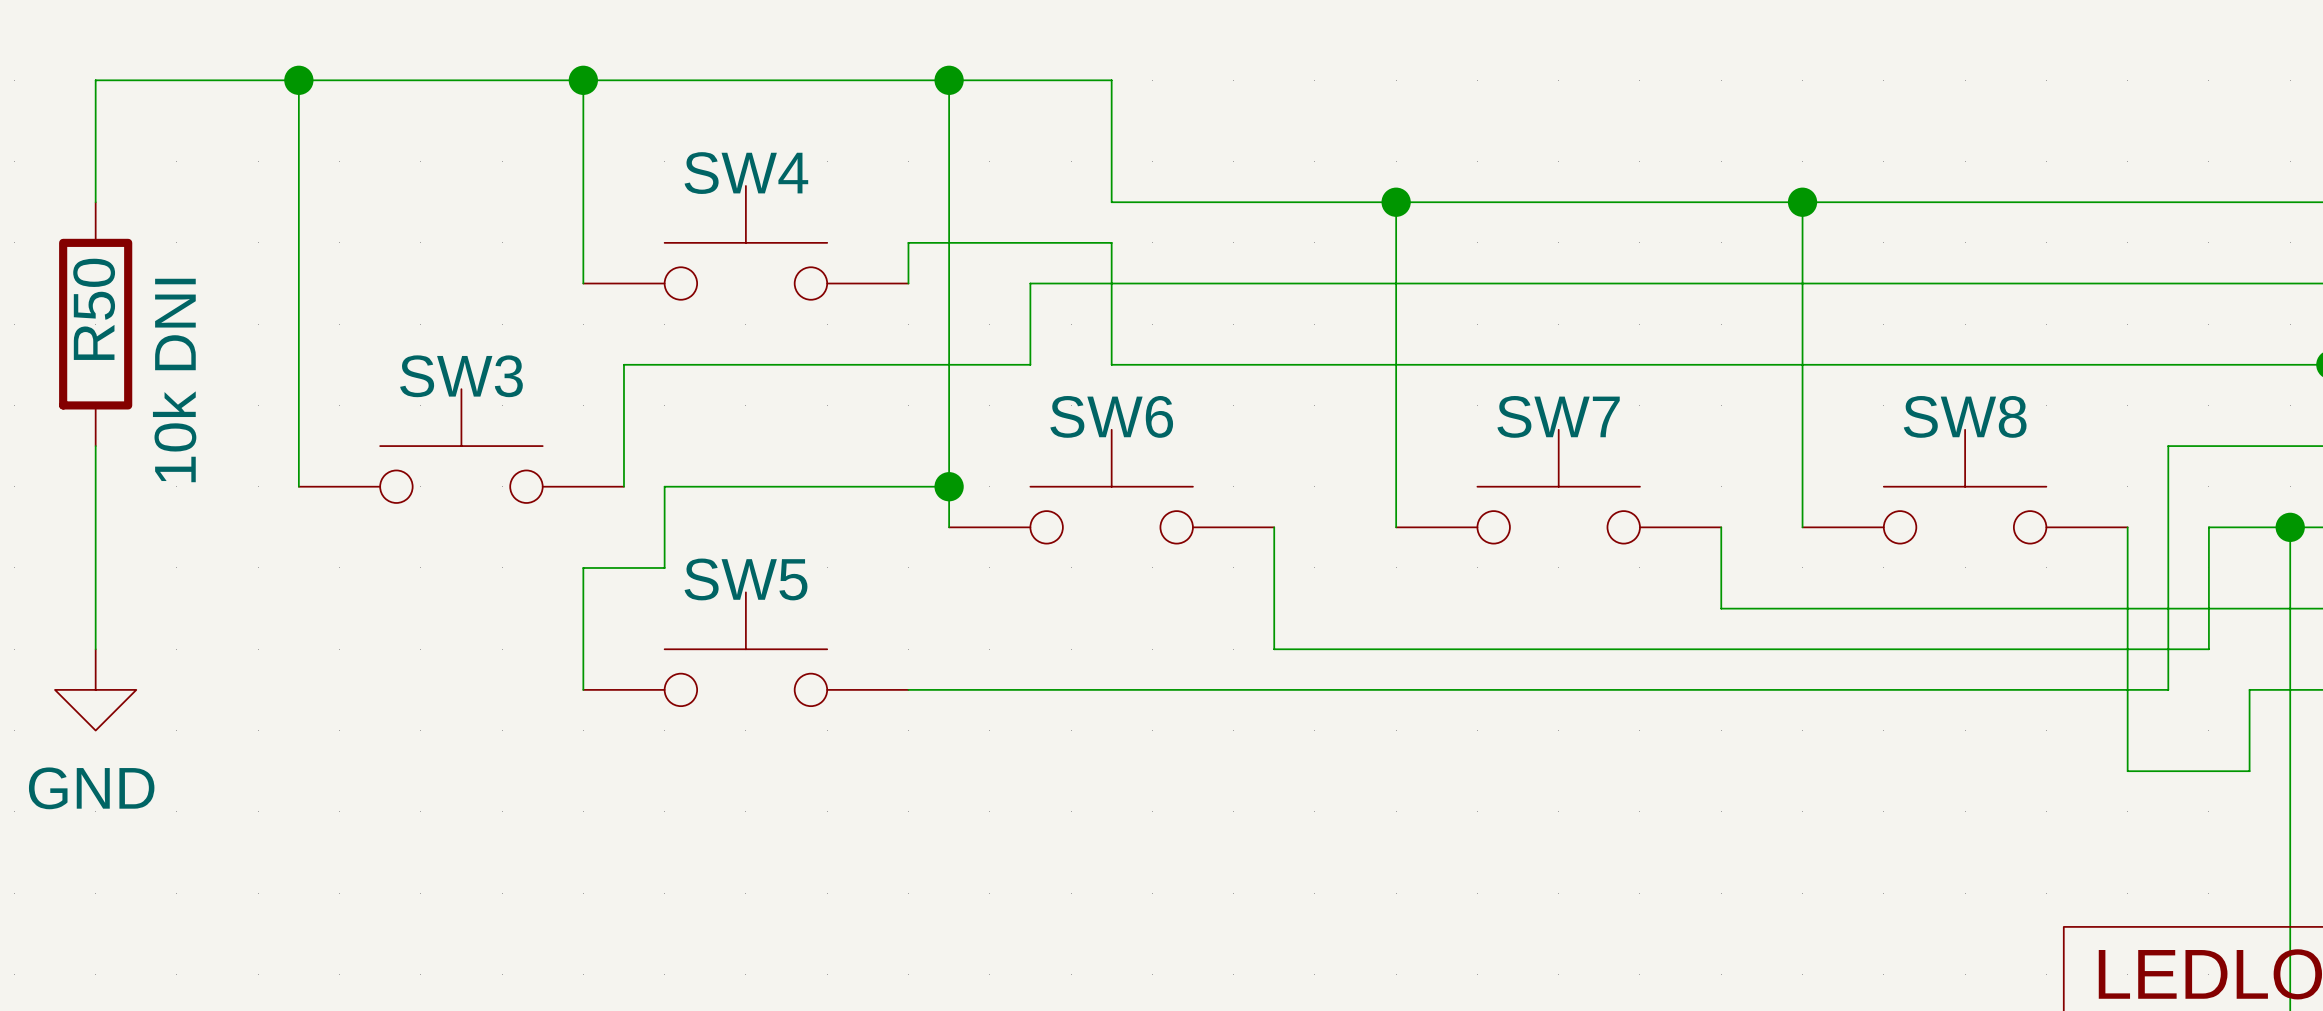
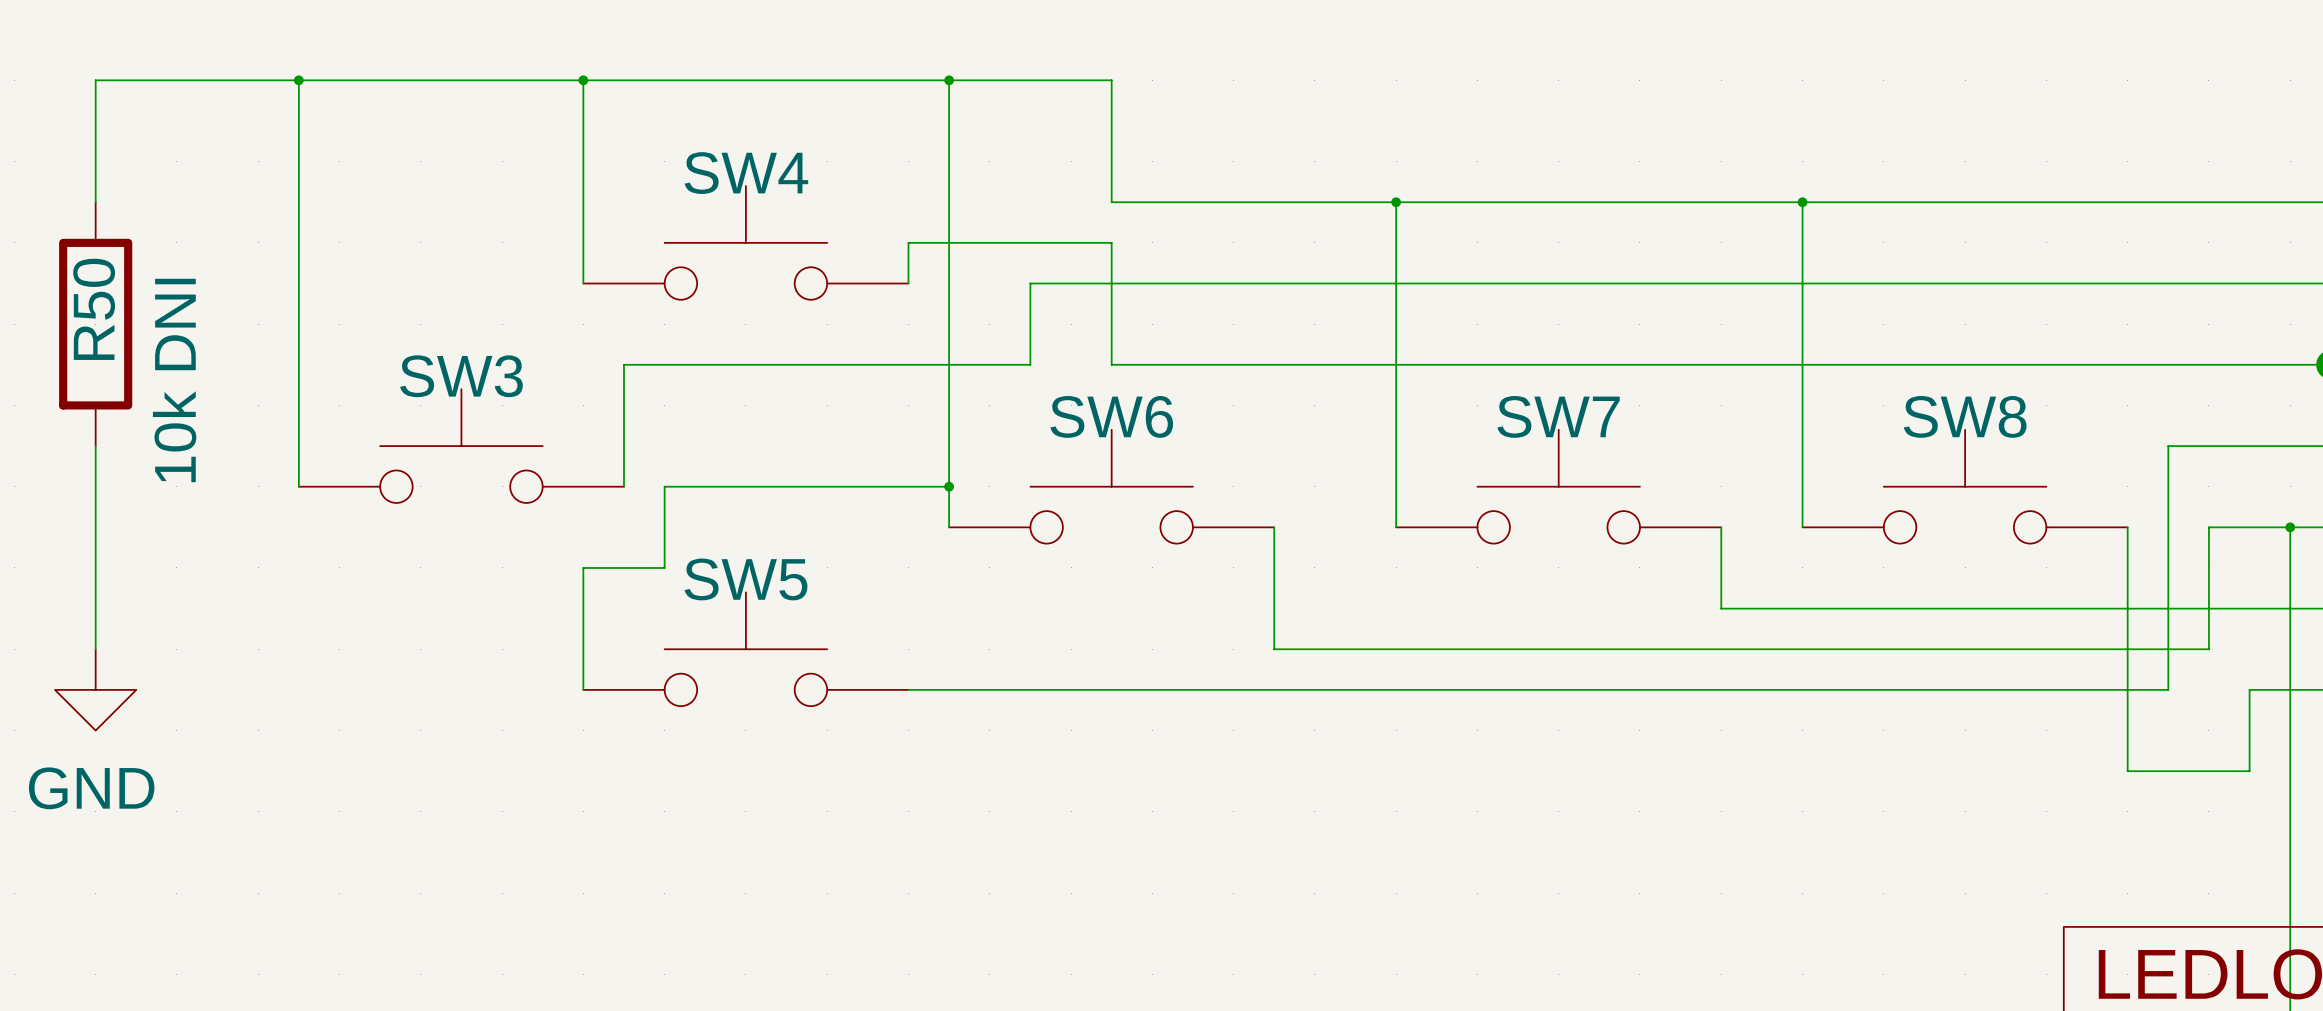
junction size: [284, 65, 314, 95] -> [293, 75, 304, 86]
junction size: [568, 65, 598, 95] -> [578, 75, 589, 86]
junction size: [934, 65, 964, 95] -> [944, 75, 954, 86]
junction size: [1381, 187, 1411, 217] -> [1391, 197, 1402, 208]
junction size: [1787, 187, 1818, 217] -> [1797, 197, 1808, 208]
junction size: [934, 472, 964, 502] -> [944, 481, 954, 492]
junction size: [2275, 512, 2305, 542] -> [2285, 522, 2296, 533]

